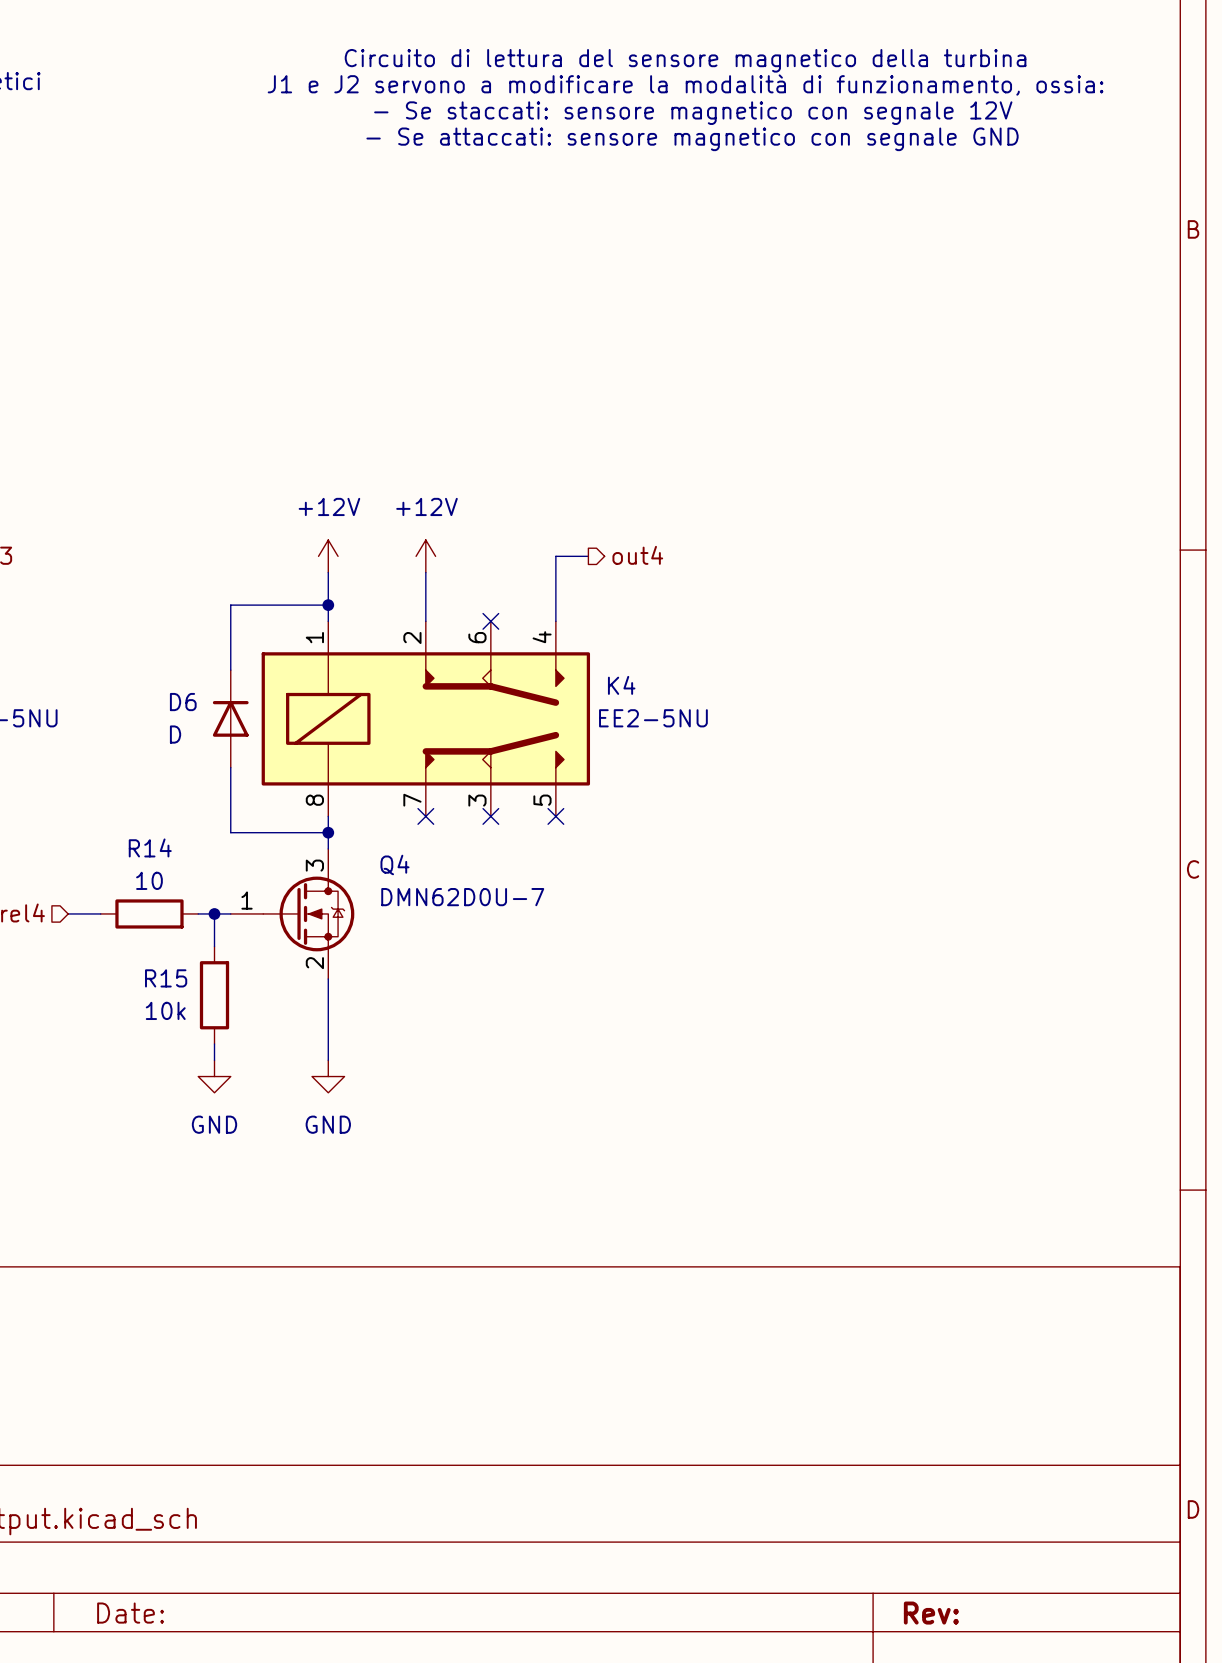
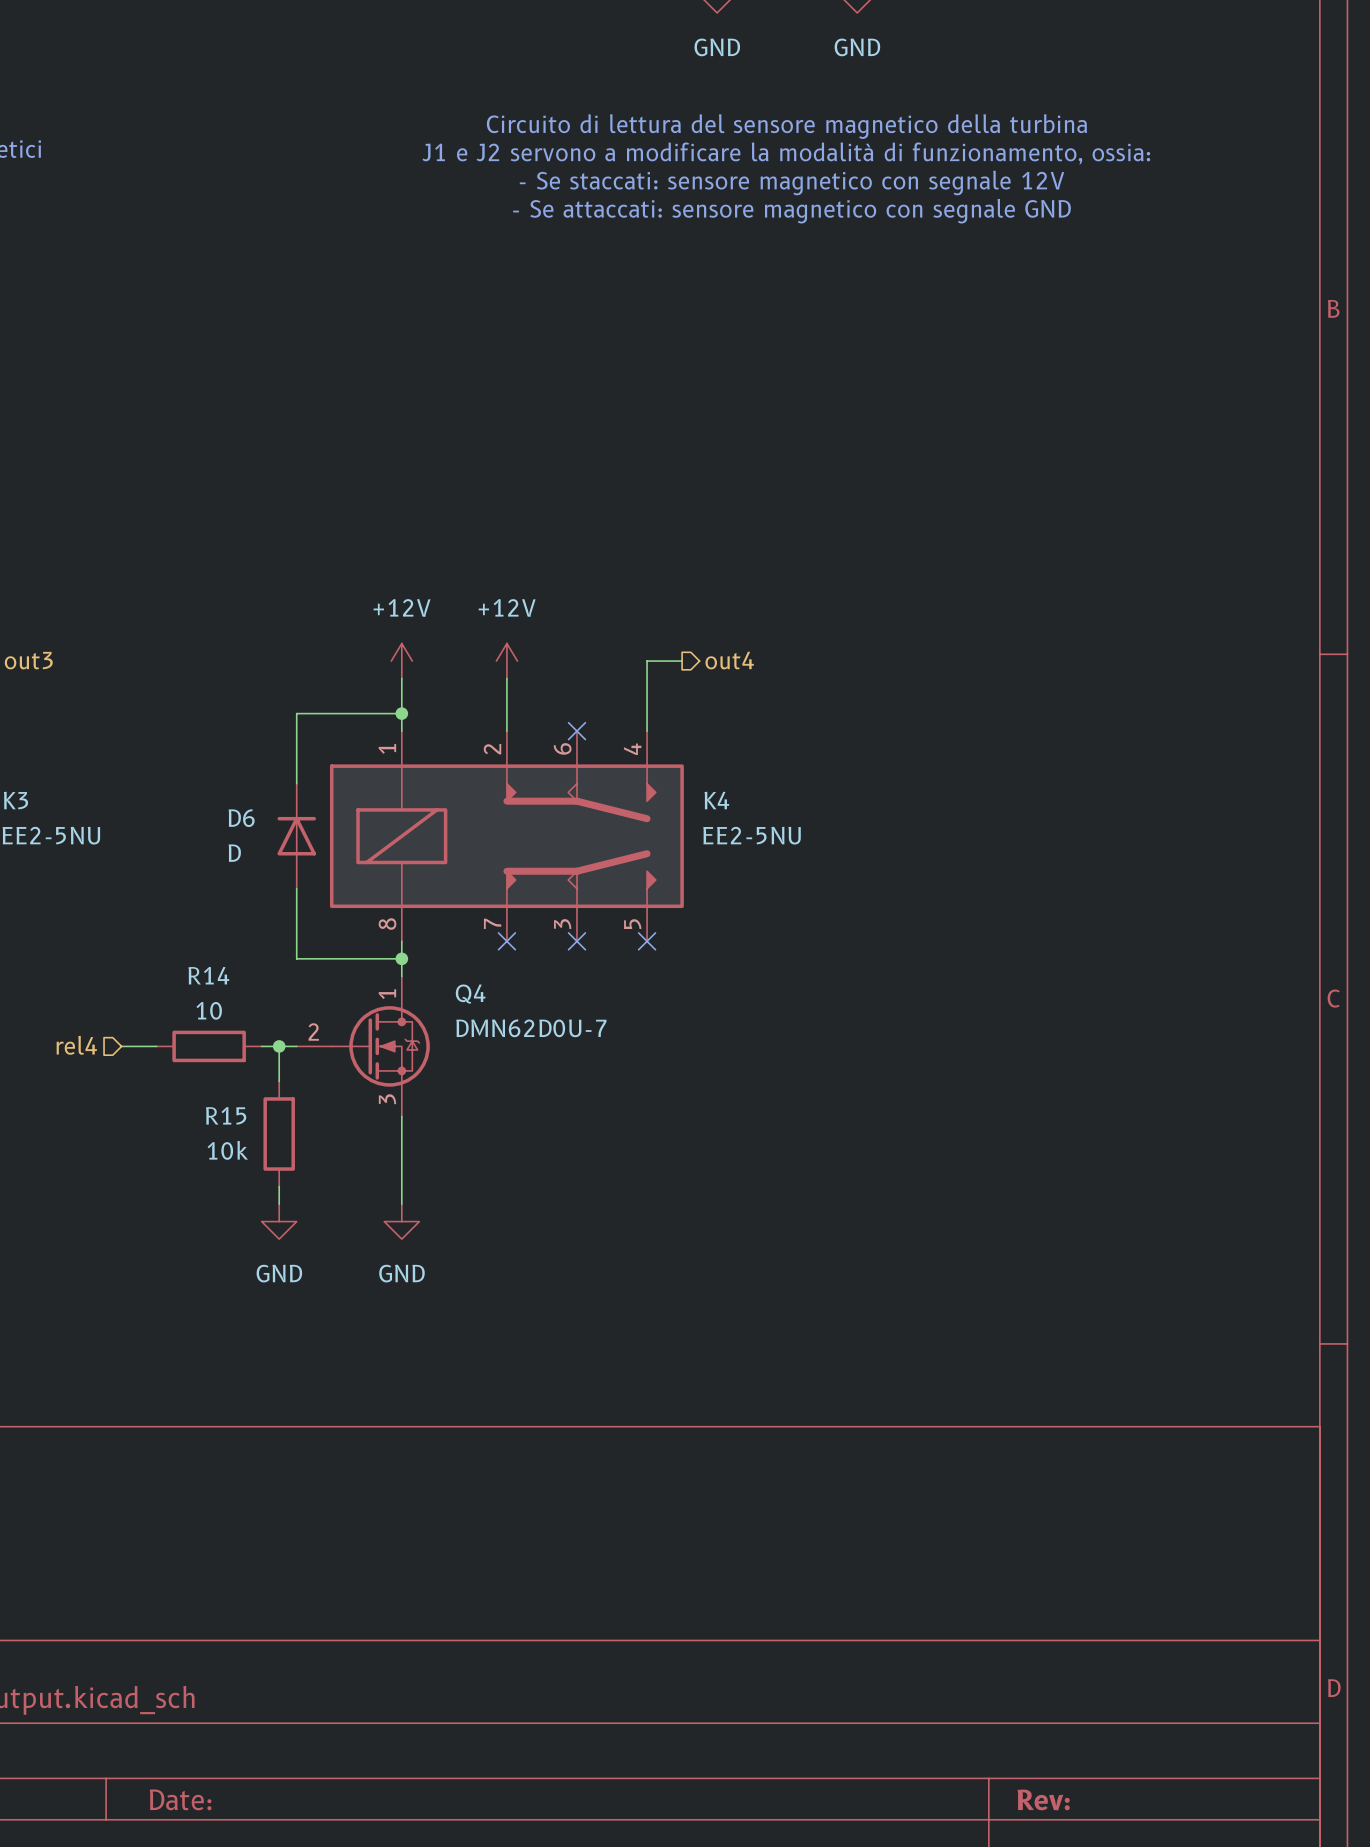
Q4 pin number: 3 (314, 865) -> 1 (387, 994)
Q4 pin number: 1 (247, 900) -> 2 (313, 1031)
Q4 pin number: 2 (314, 963) -> 3 (387, 1099)

